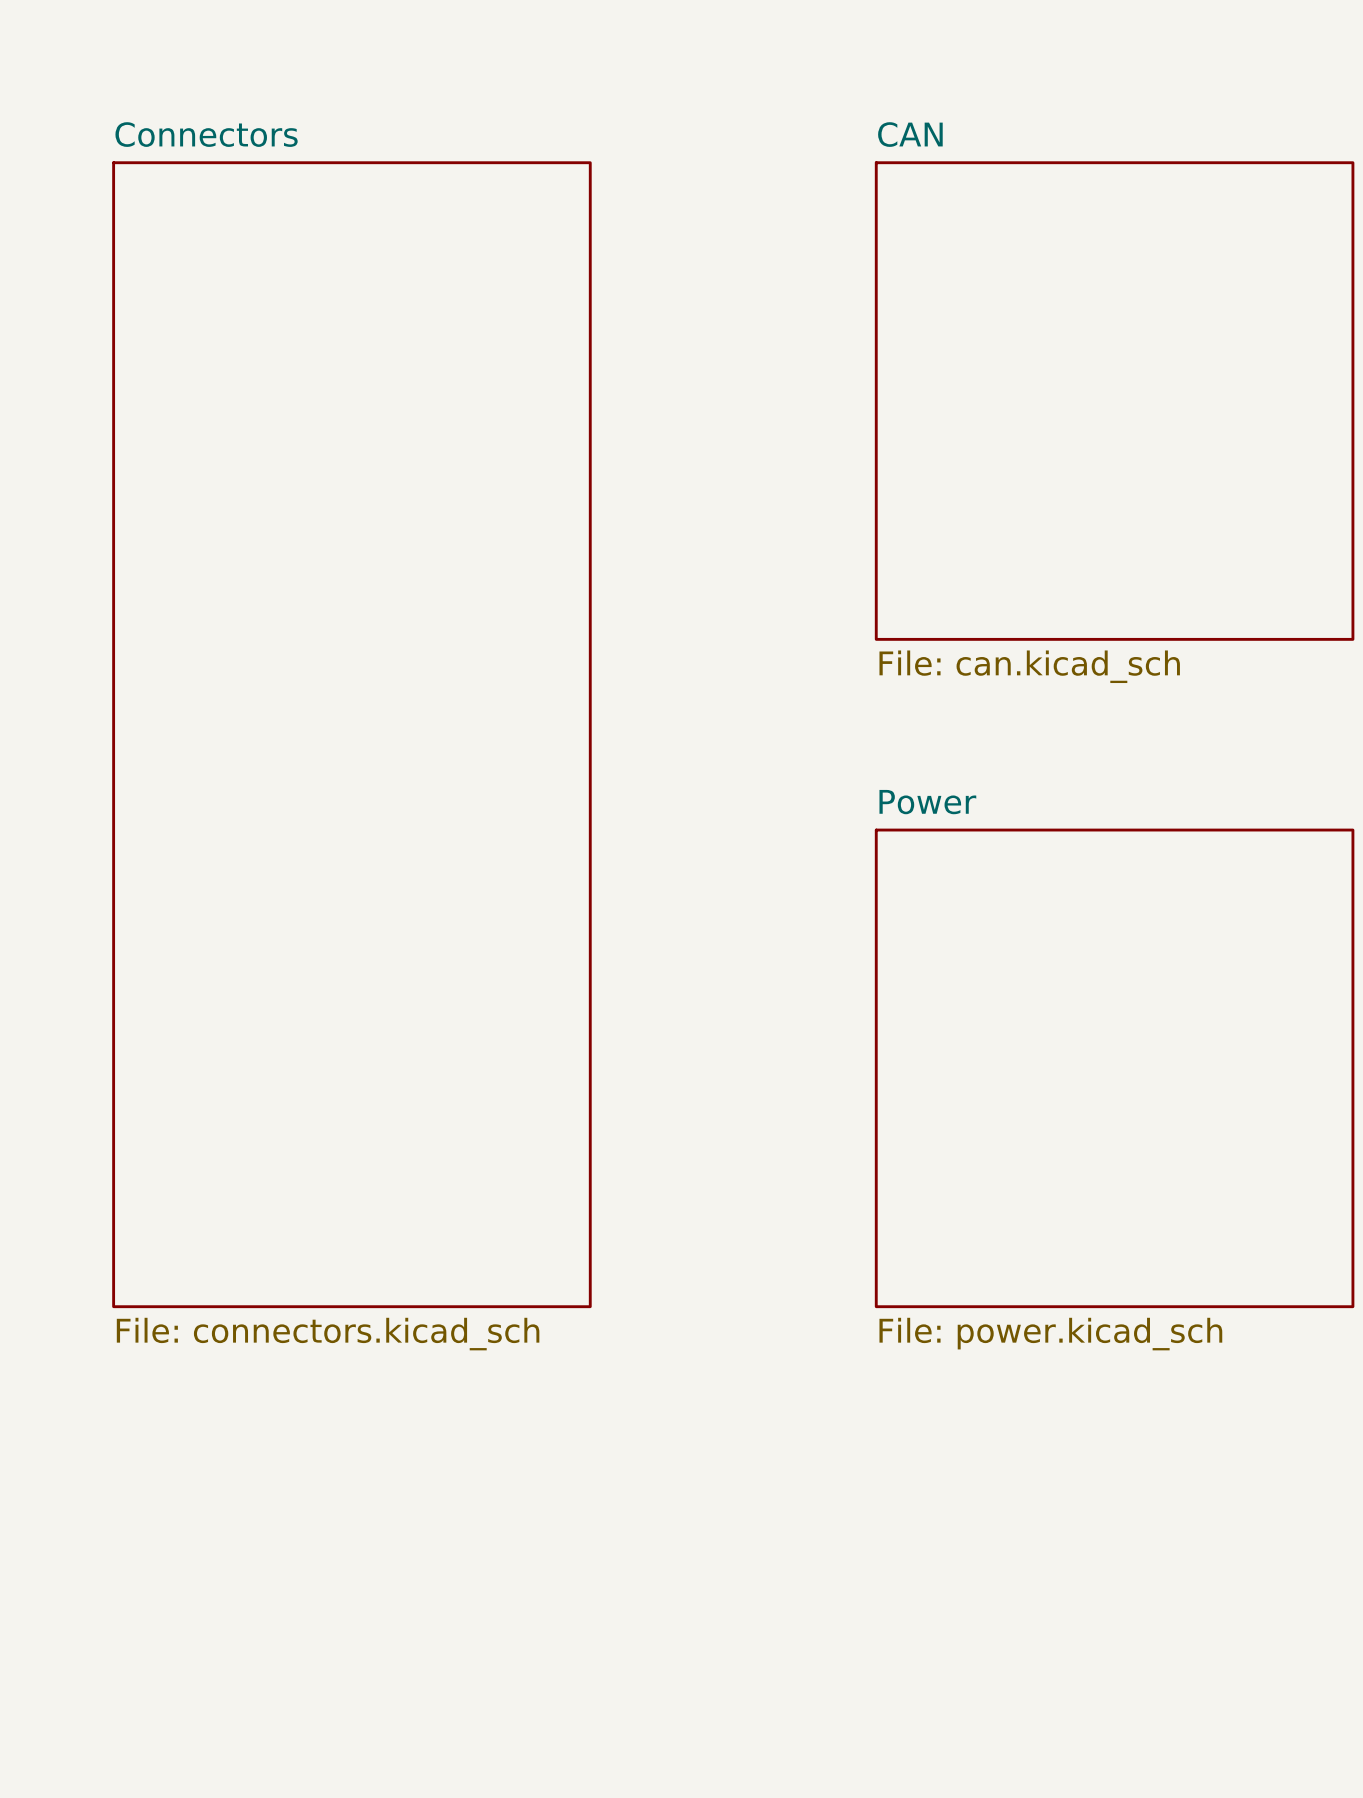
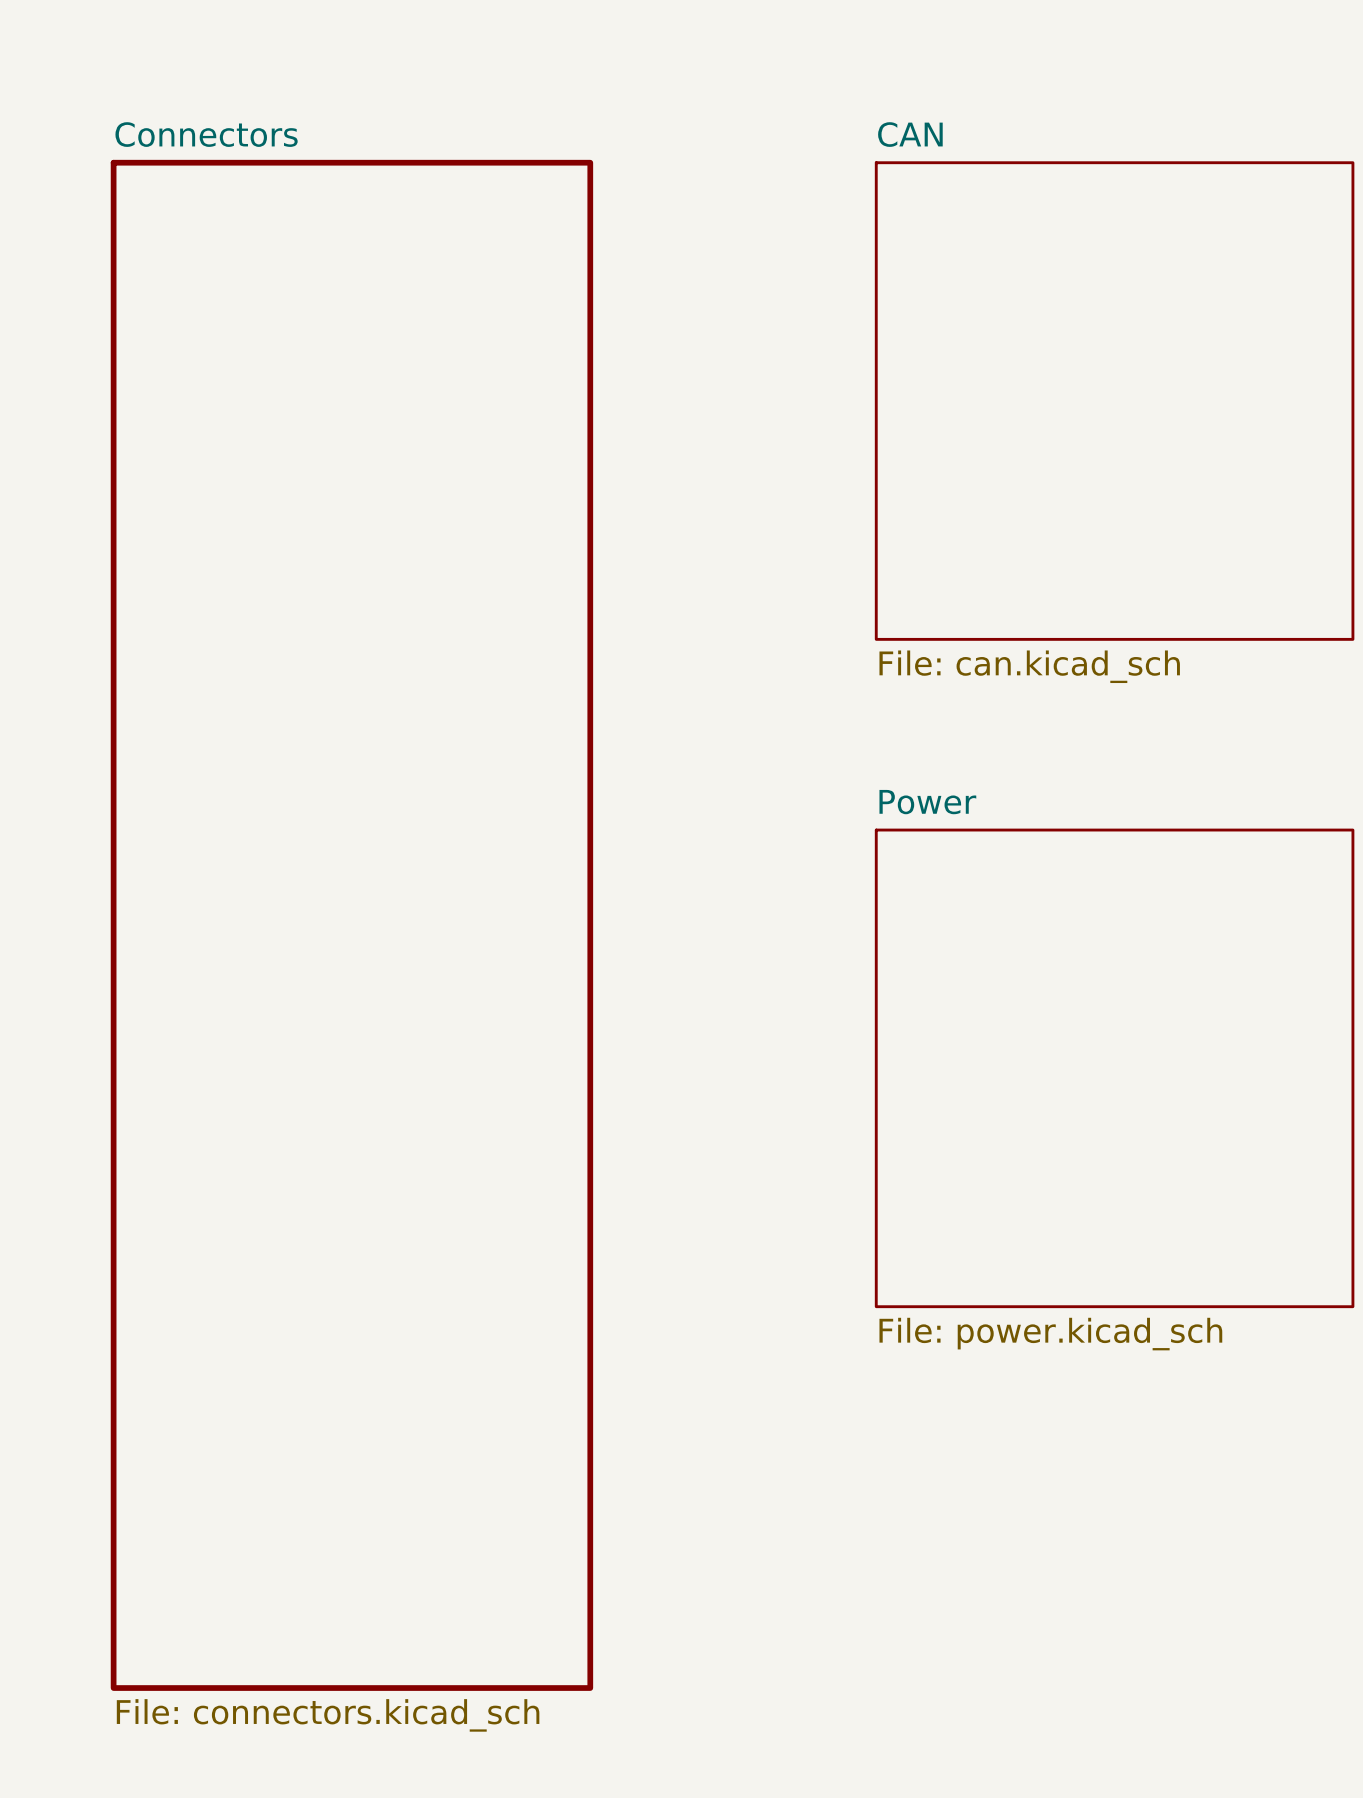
sheet Connectors: File: connectors.kicad_sch (351, 734) -> none
sheet Connectors: none -> File: connectors.kicad_sch (351, 925)

